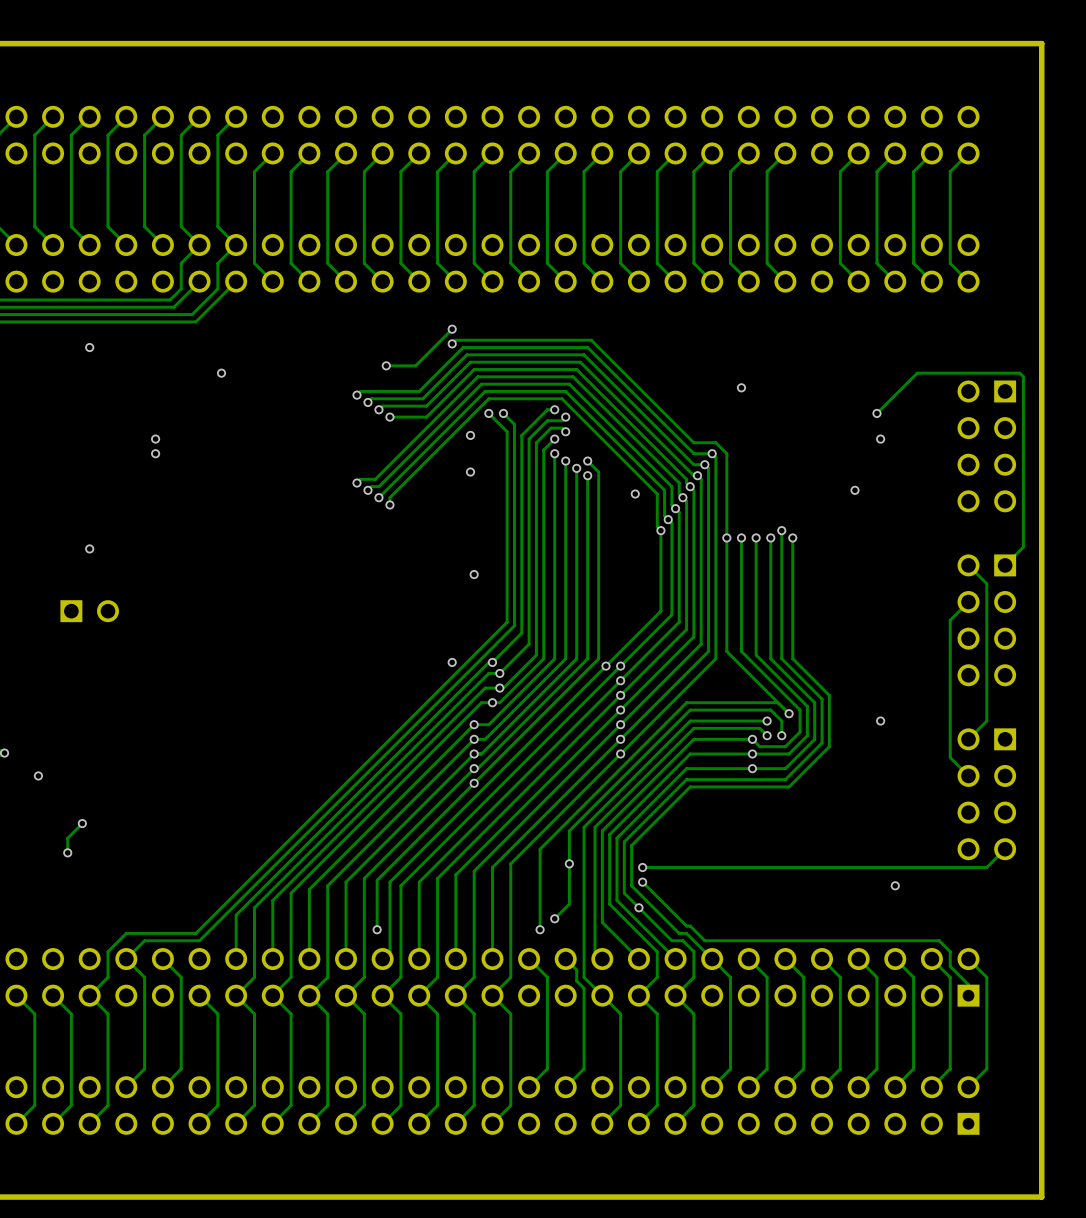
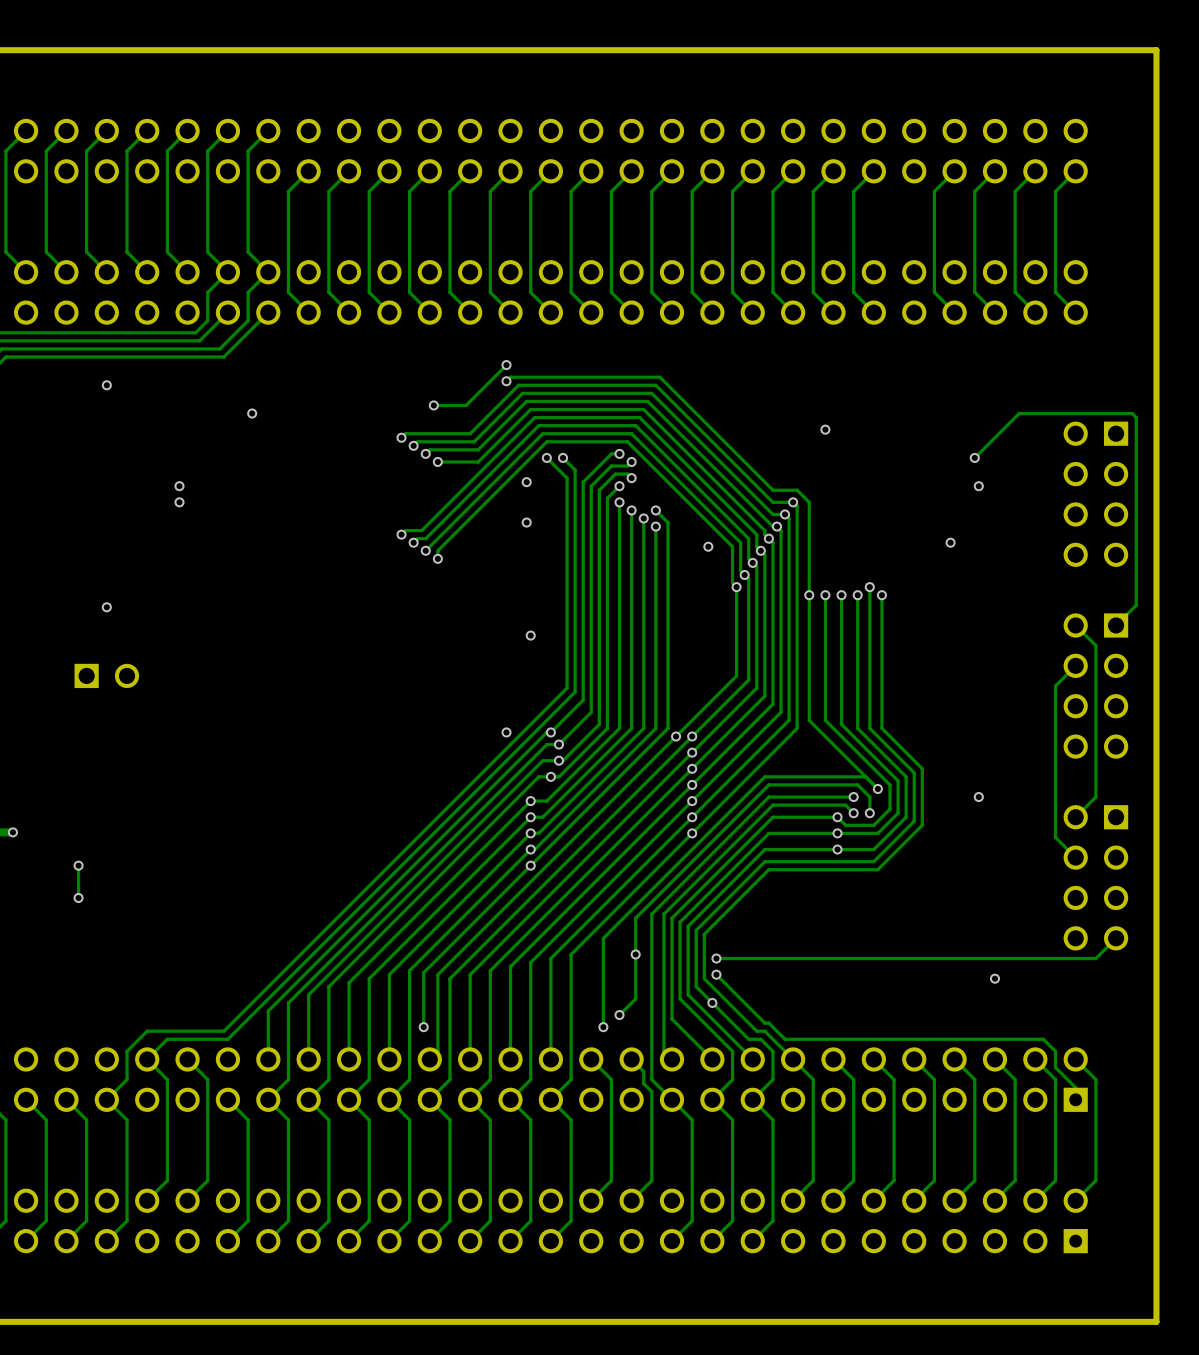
via: (38, 775) -> none
track: none -> (78, 865) (78, 897)
via: none -> (78, 865)
via: none -> (78, 897)
track: (82, 823) (67, 838) (67, 852) -> none
via: (82, 823) -> none
via: (67, 852) -> none

